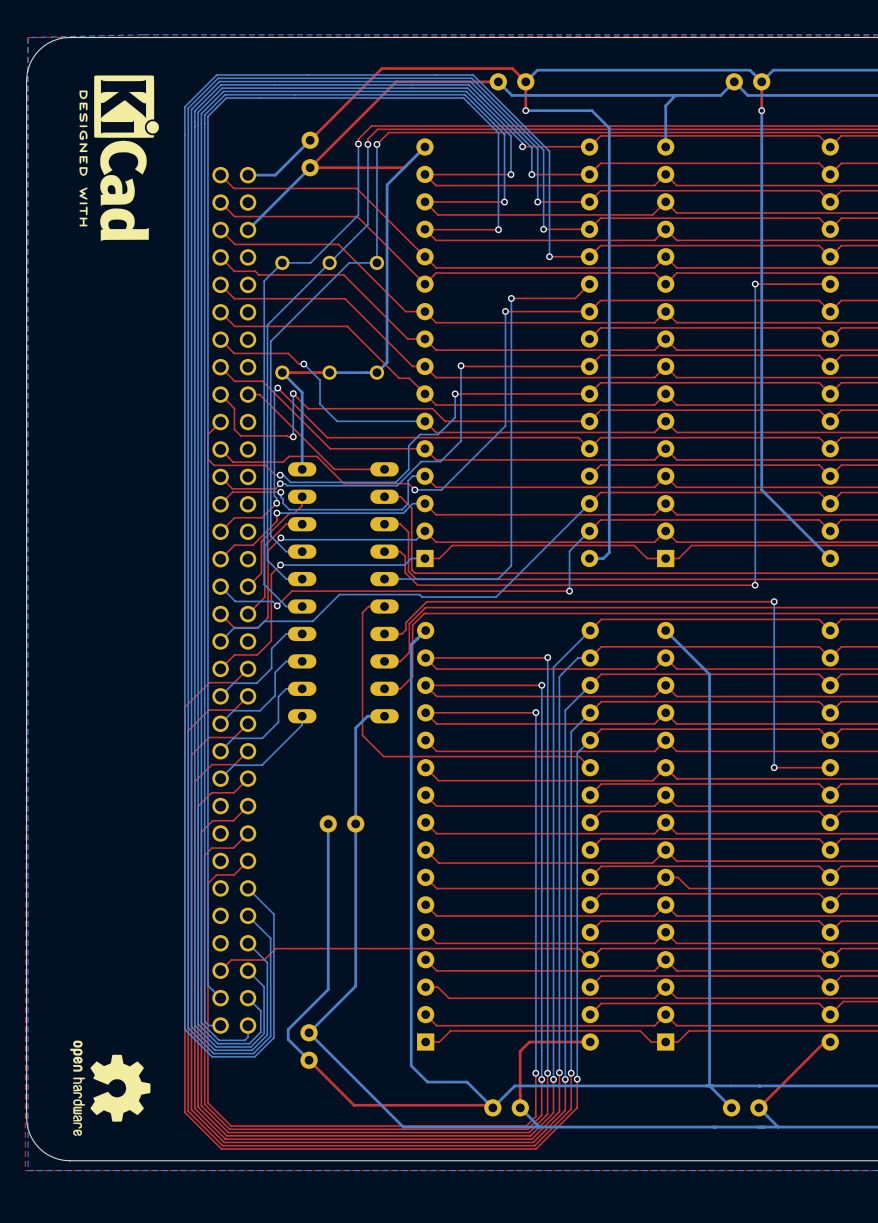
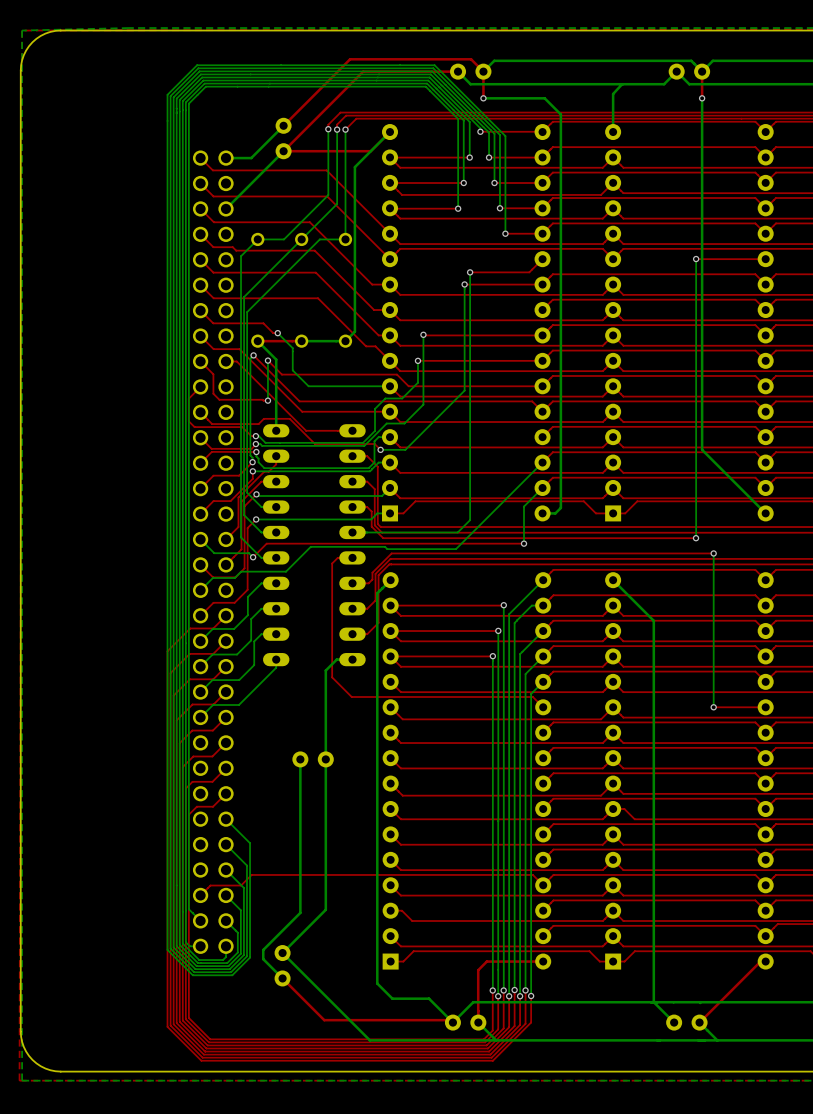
drawing: [79, 75, 159, 242] -> none
drawing: [69, 1040, 151, 1136] -> none

